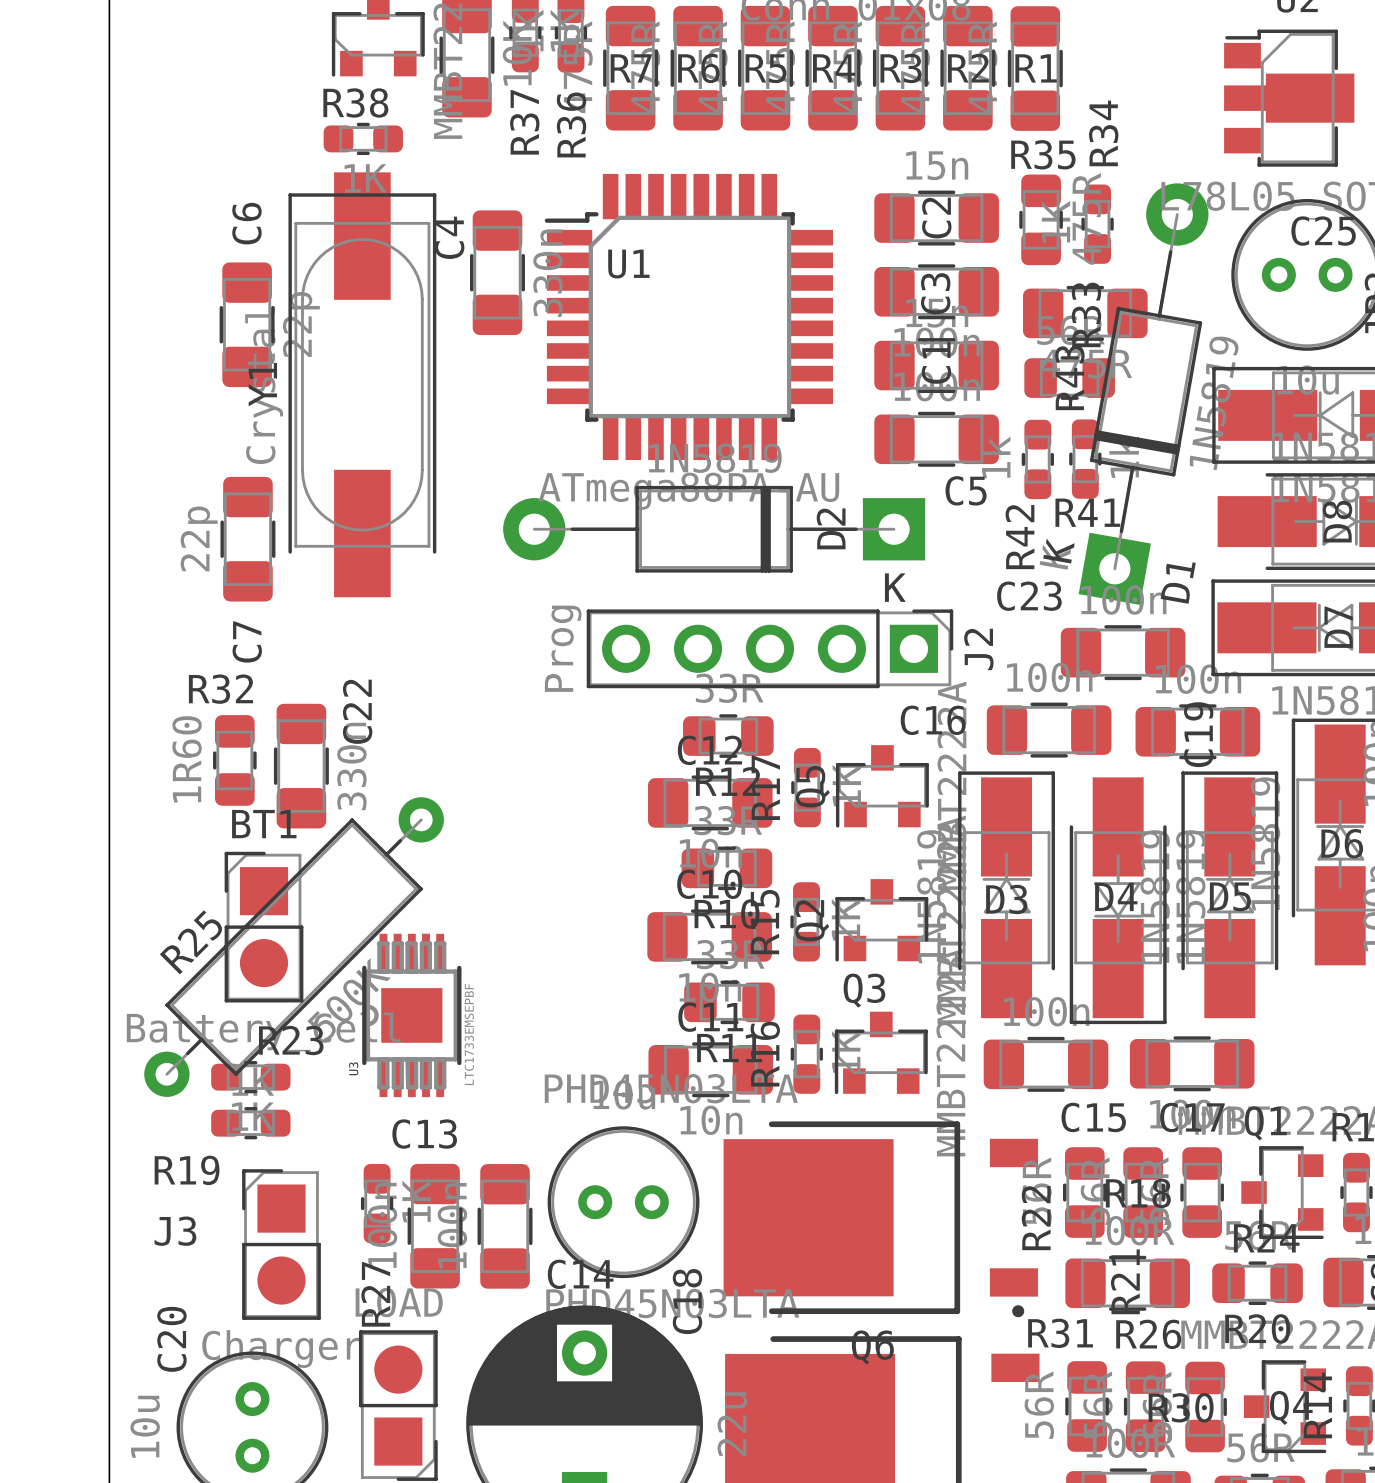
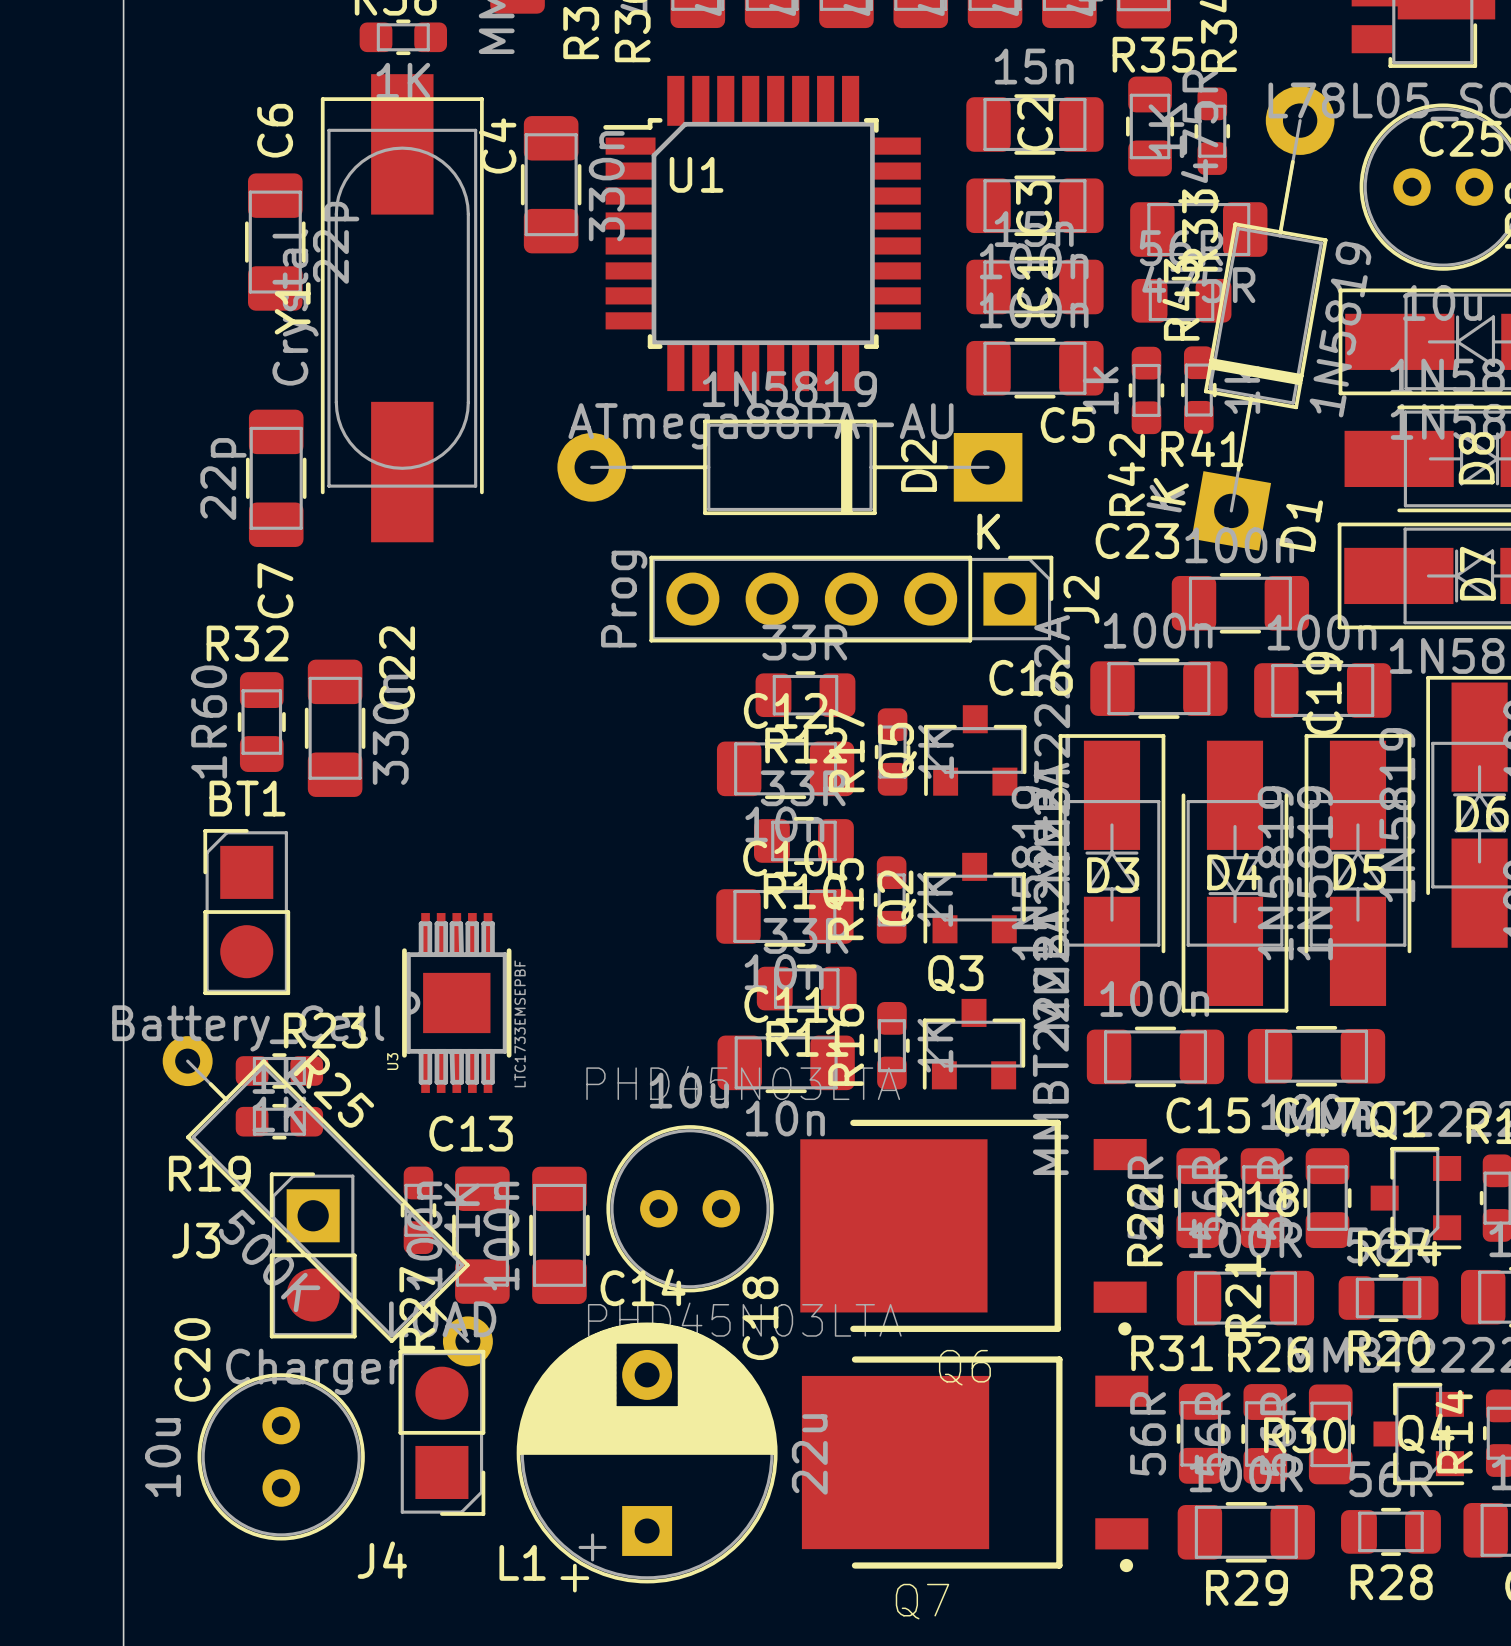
BT1 position: (264, 927) -> (246, 912)
R25 rotation: 0° (294, 947) -> 90° clockwise (327, 1201)
R25 position: (294, 947) -> (327, 1201)
J3 footprint: [242, 1169, 321, 1320] -> [269, 1172, 357, 1339]

